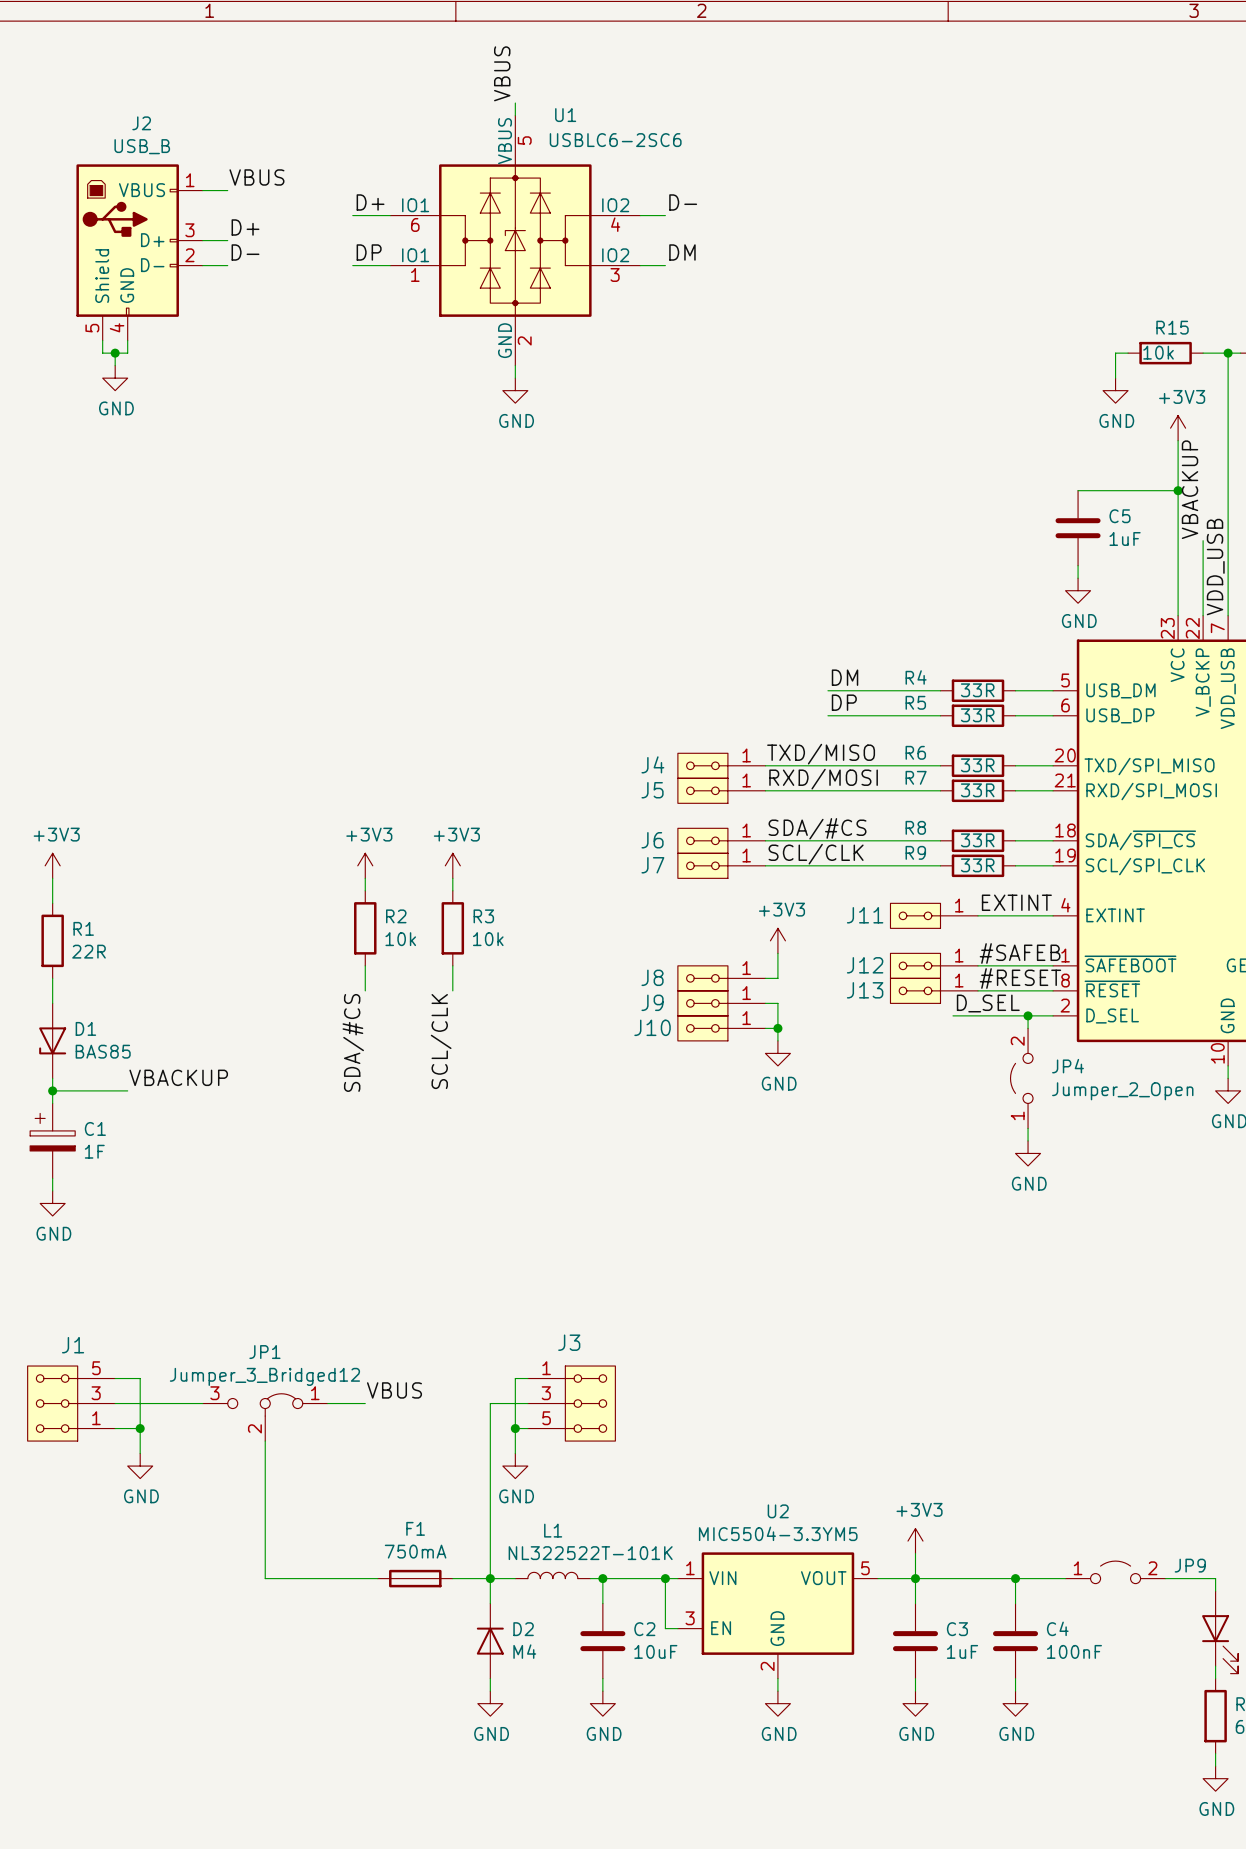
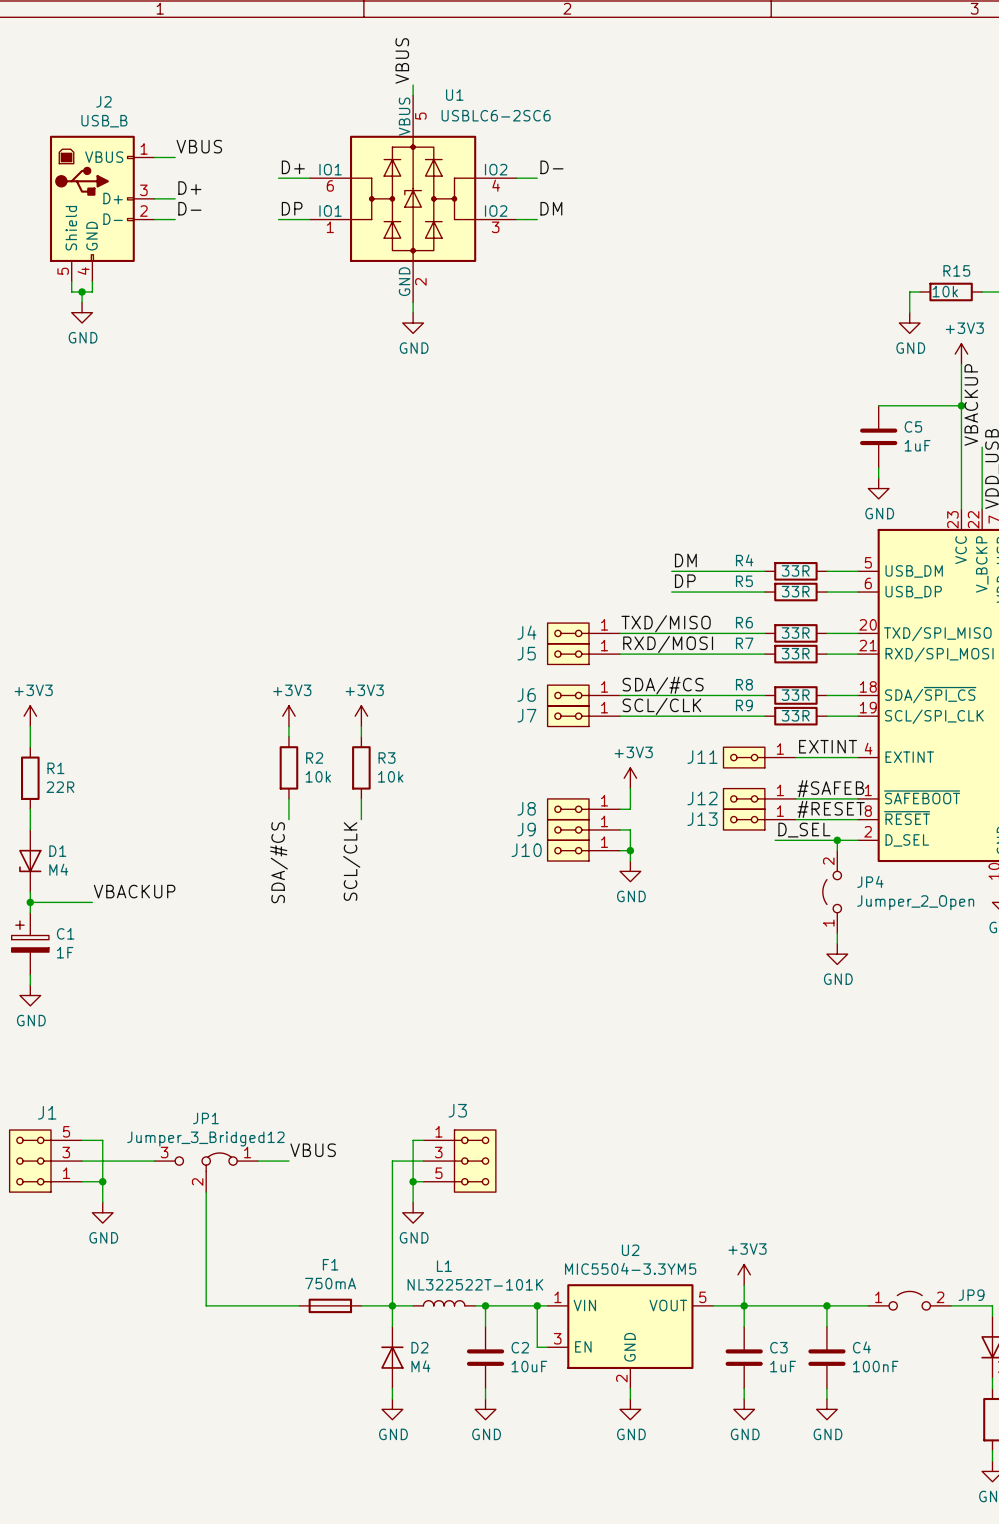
D1 value: BAS85 (103, 1051) -> M4 (58, 869)

